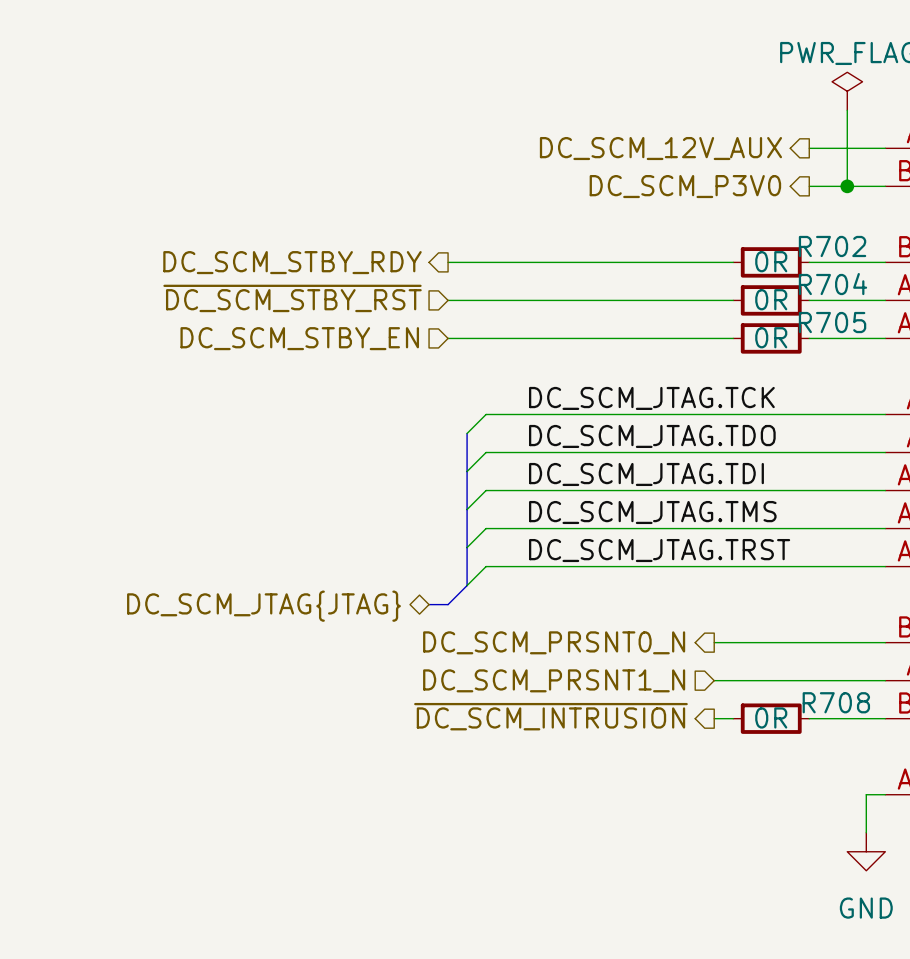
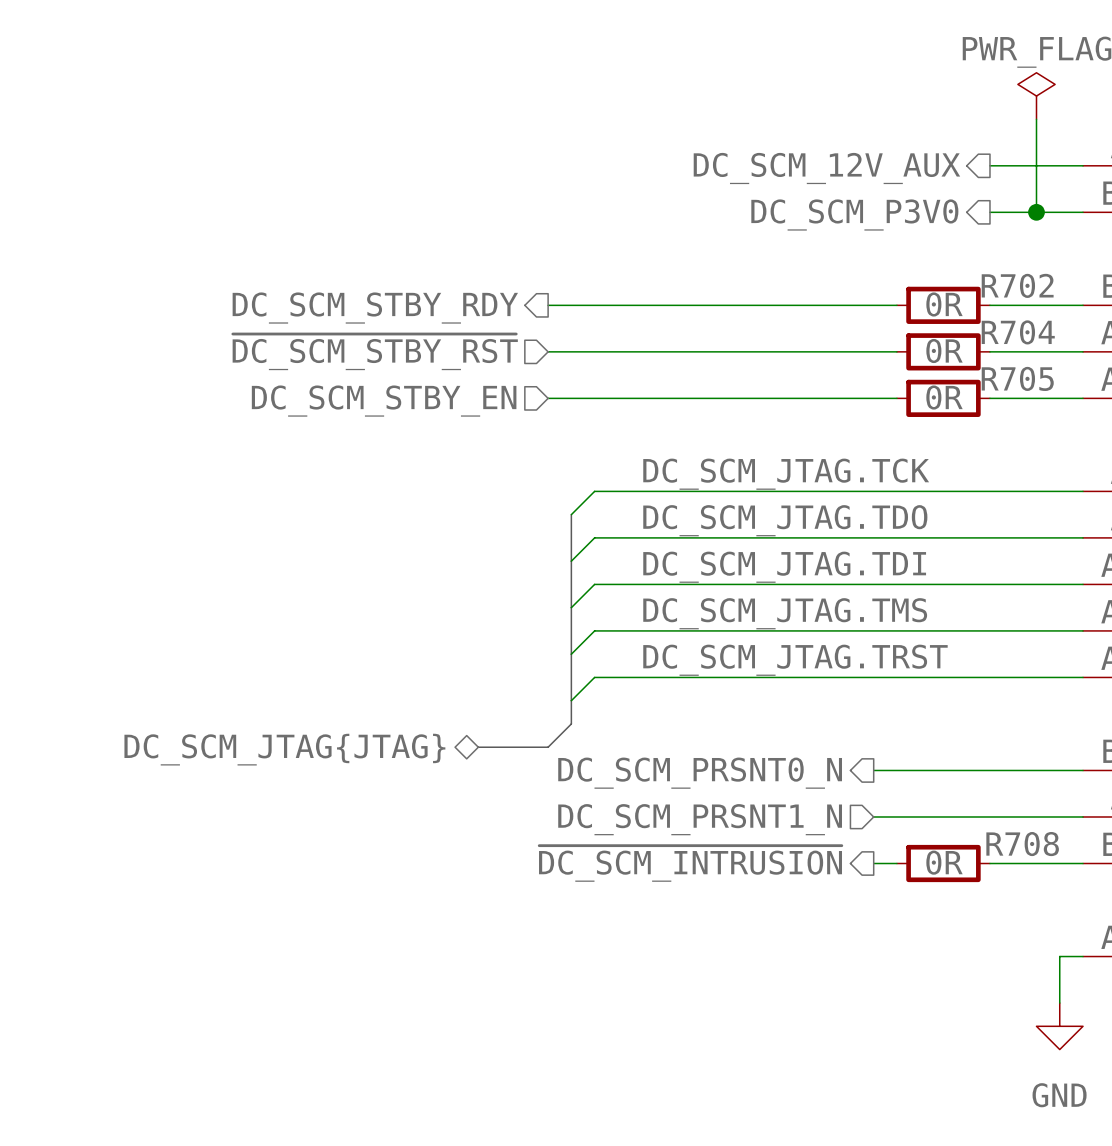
bus: (467, 585) (448, 604) (429, 604) -> (571, 700) (571, 723) (548, 747) (478, 747)
hierarchical label position: DC_SCM_JTAG{JTAG} (263, 606) -> DC_SCM_JTAG{JTAG} (284, 749)

